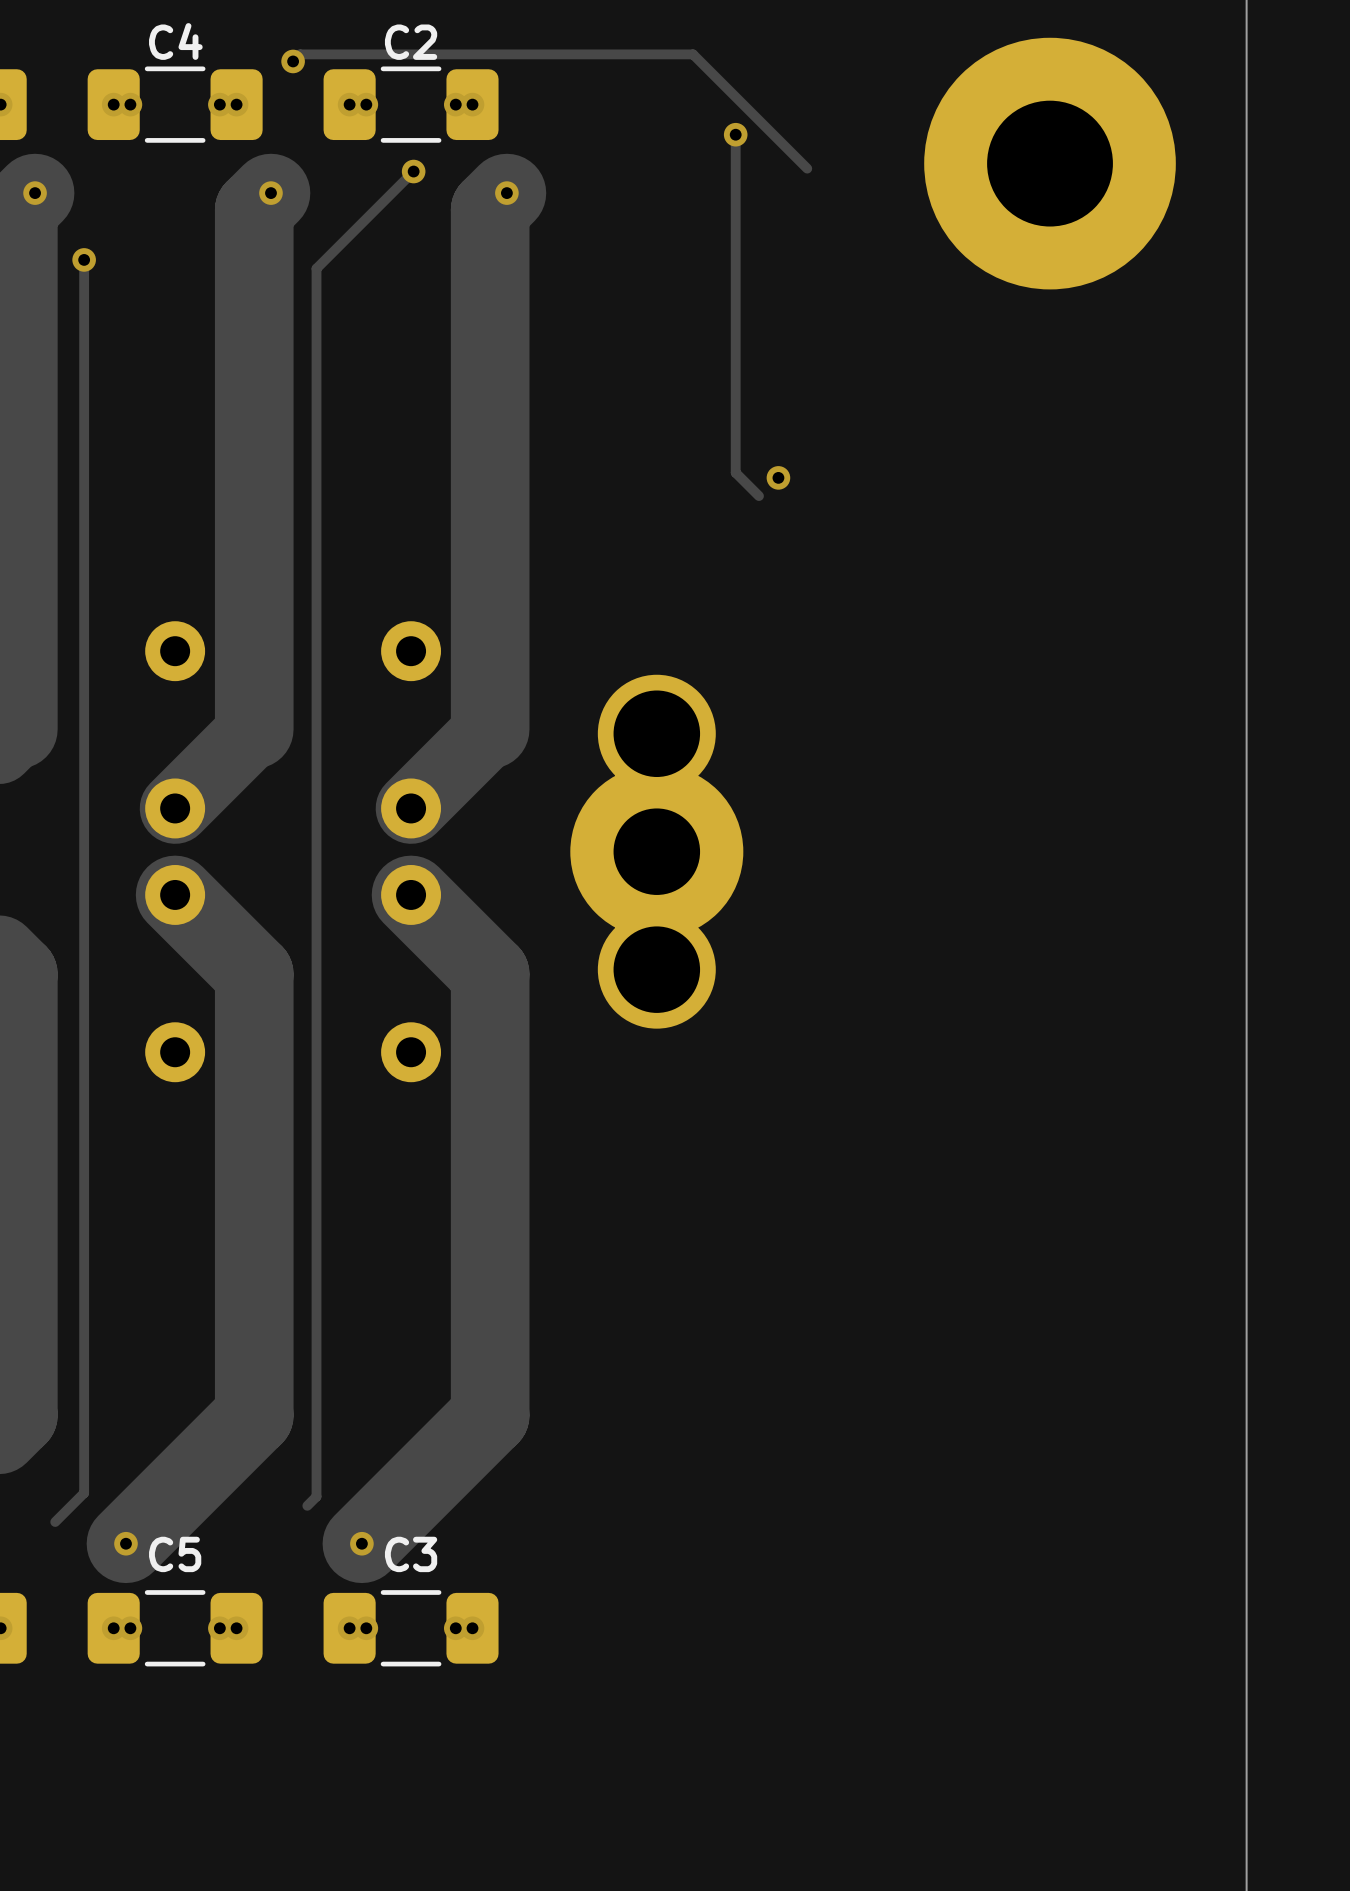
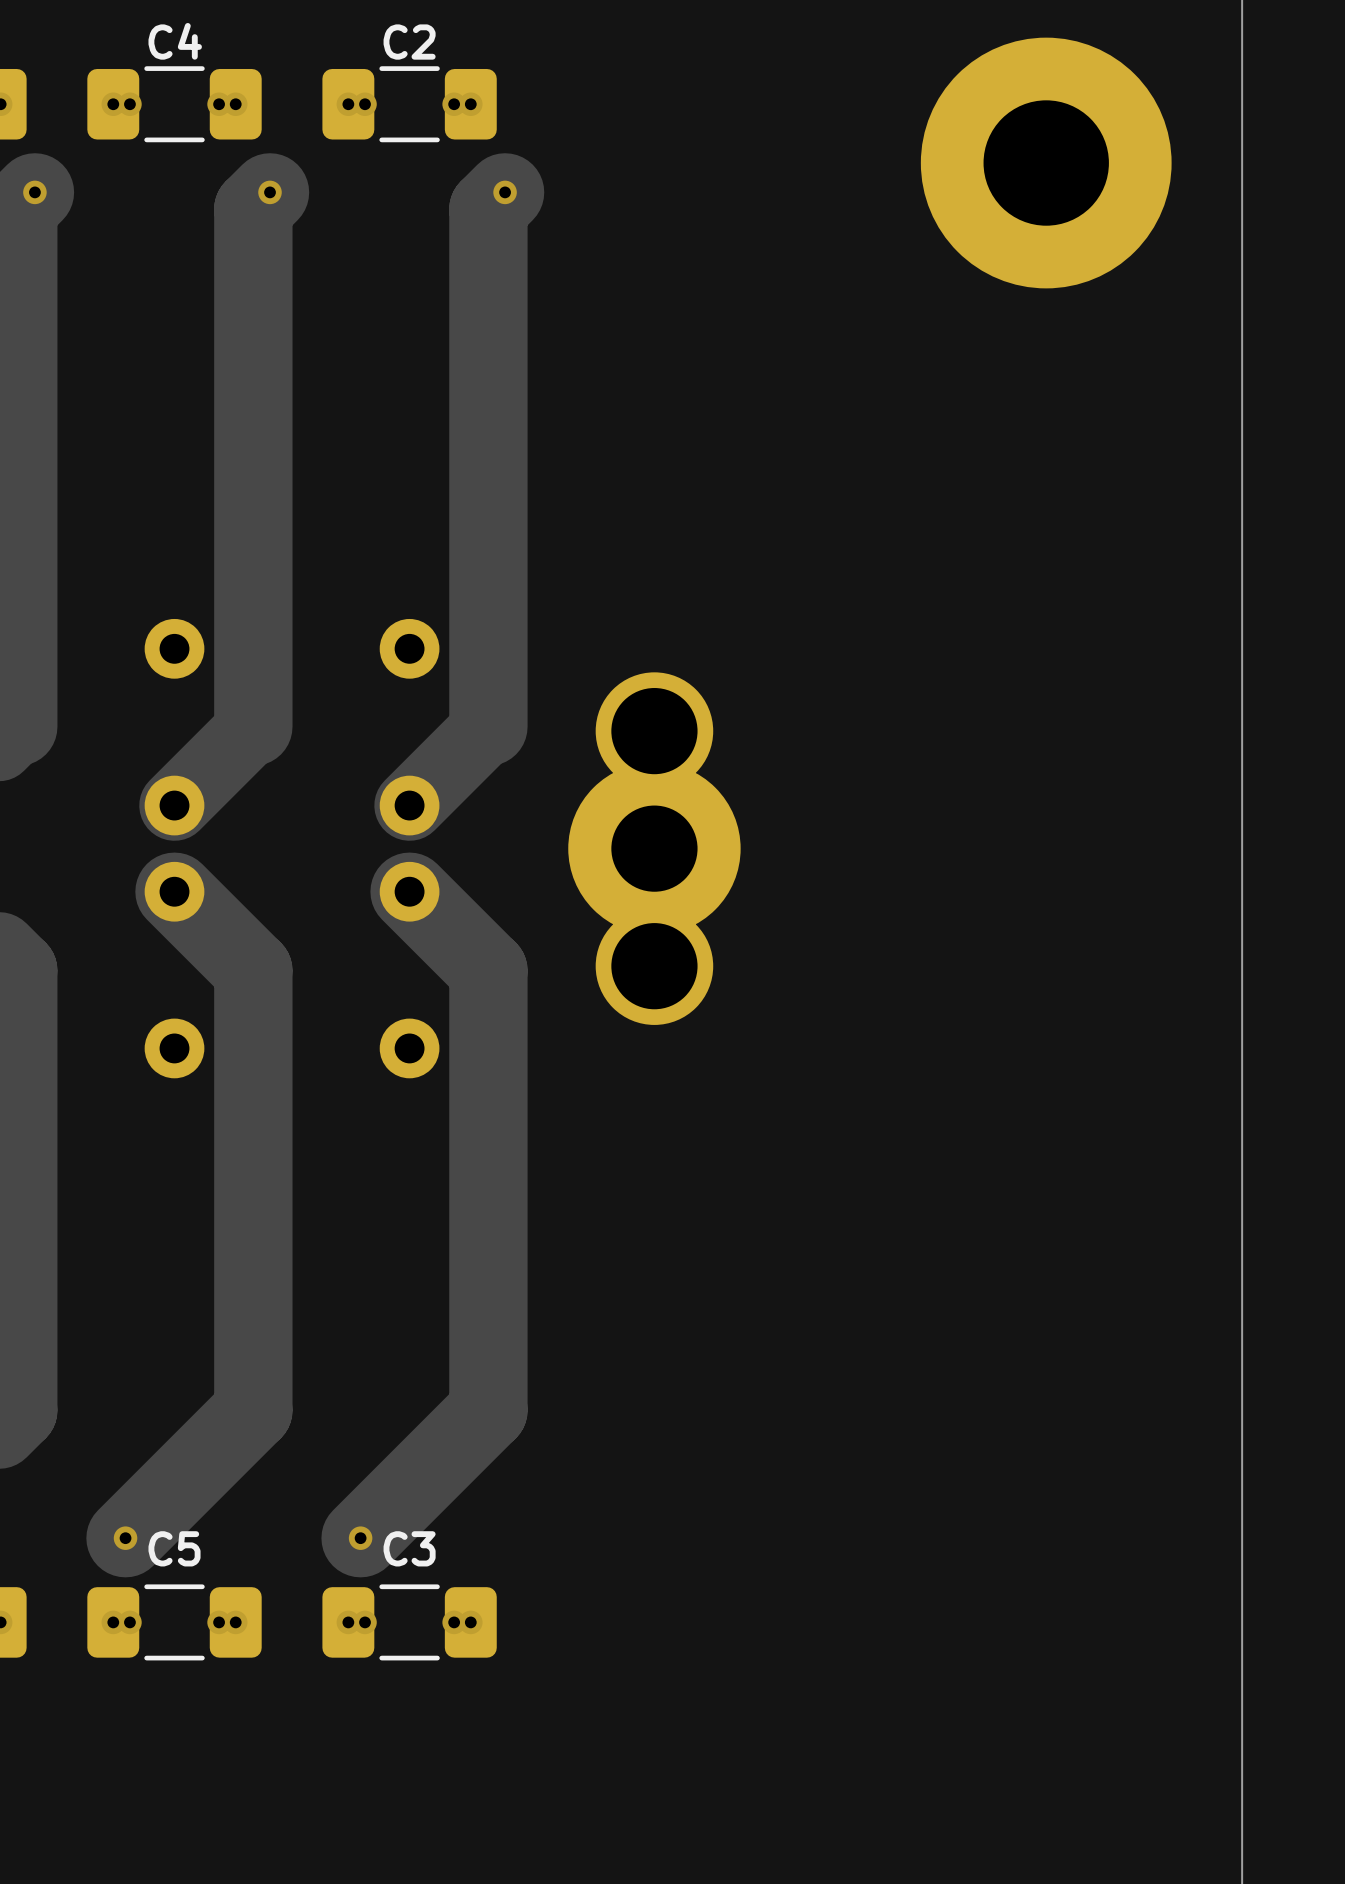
track: (293, 61) (300, 54) (693, 54) (807, 168) -> none
via: (293, 61) -> none
track: (735, 134) (735, 472) (758, 496) -> none
via: (735, 134) -> none
track: (413, 171) (316, 268) (316, 1496) (307, 1505) -> none
via: (413, 171) -> none
track: (84, 259) (84, 1493) (55, 1521) -> none
via: (84, 259) -> none
via: (778, 477) -> none

